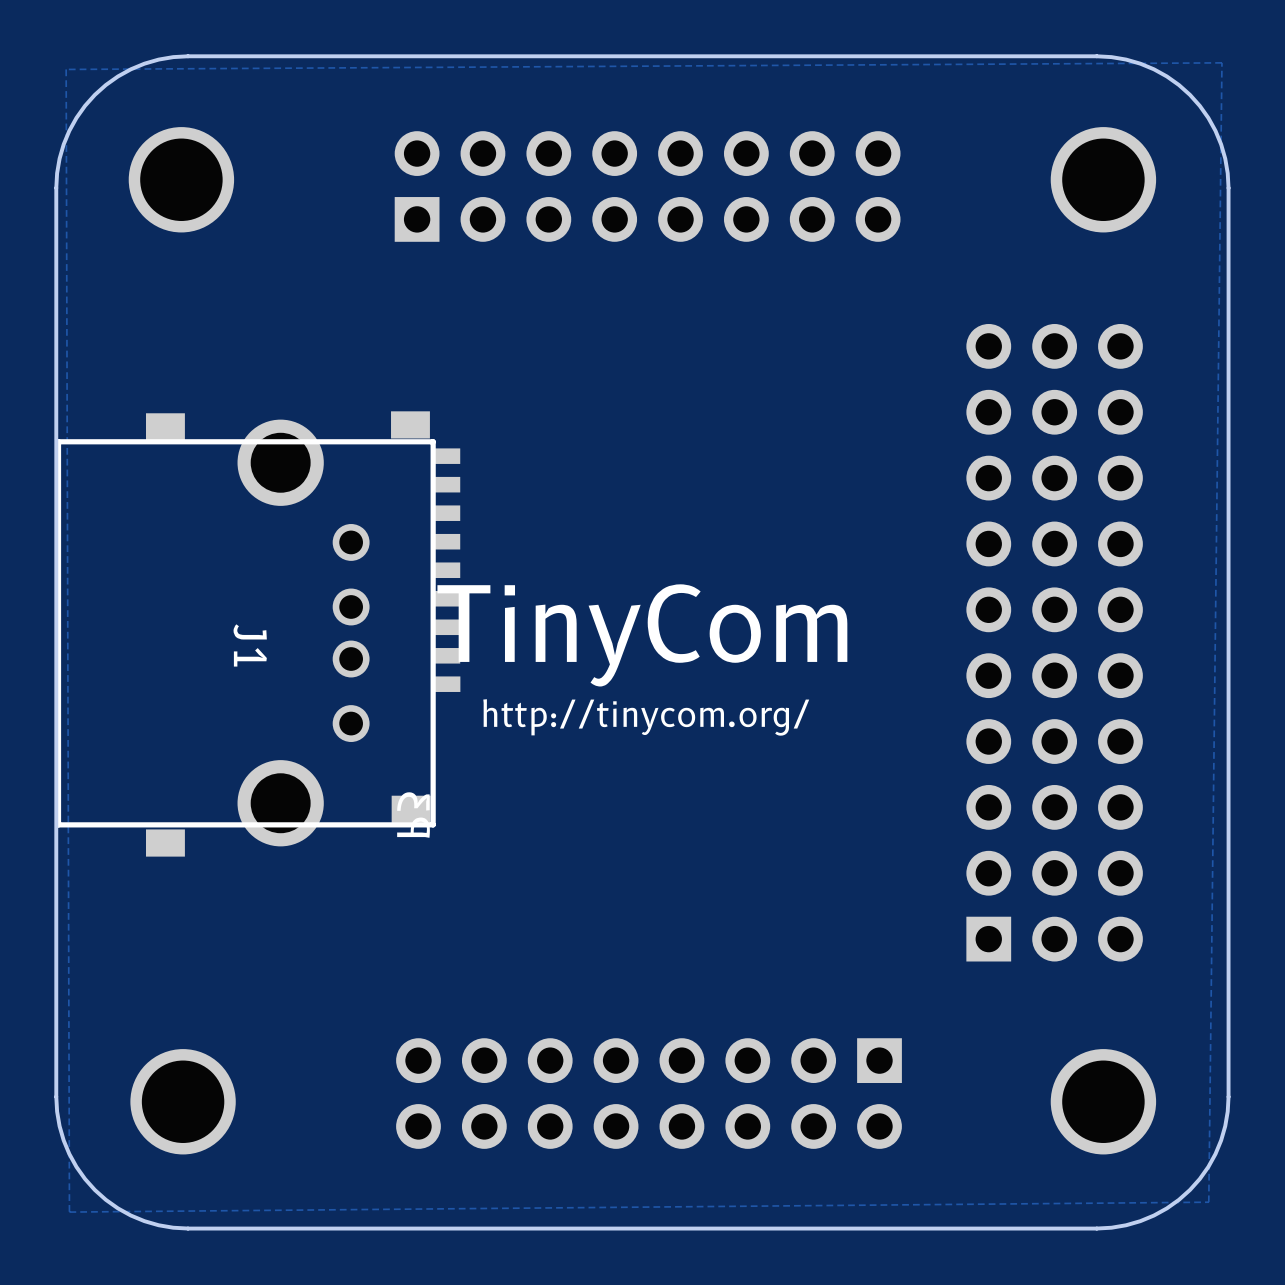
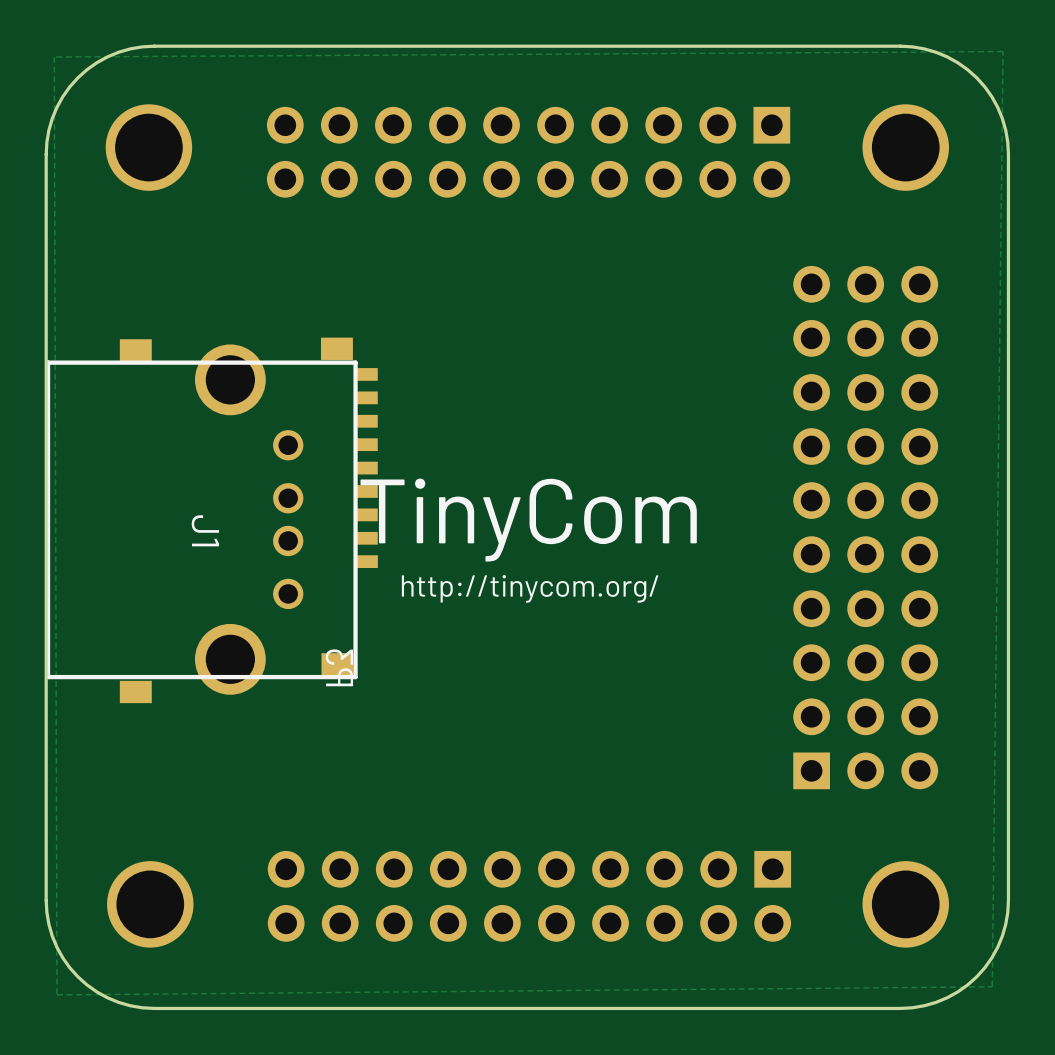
part footprint: [394, 131, 901, 242] -> [266, 106, 791, 198]
part footprint: [396, 1038, 902, 1149] -> [267, 850, 792, 942]

